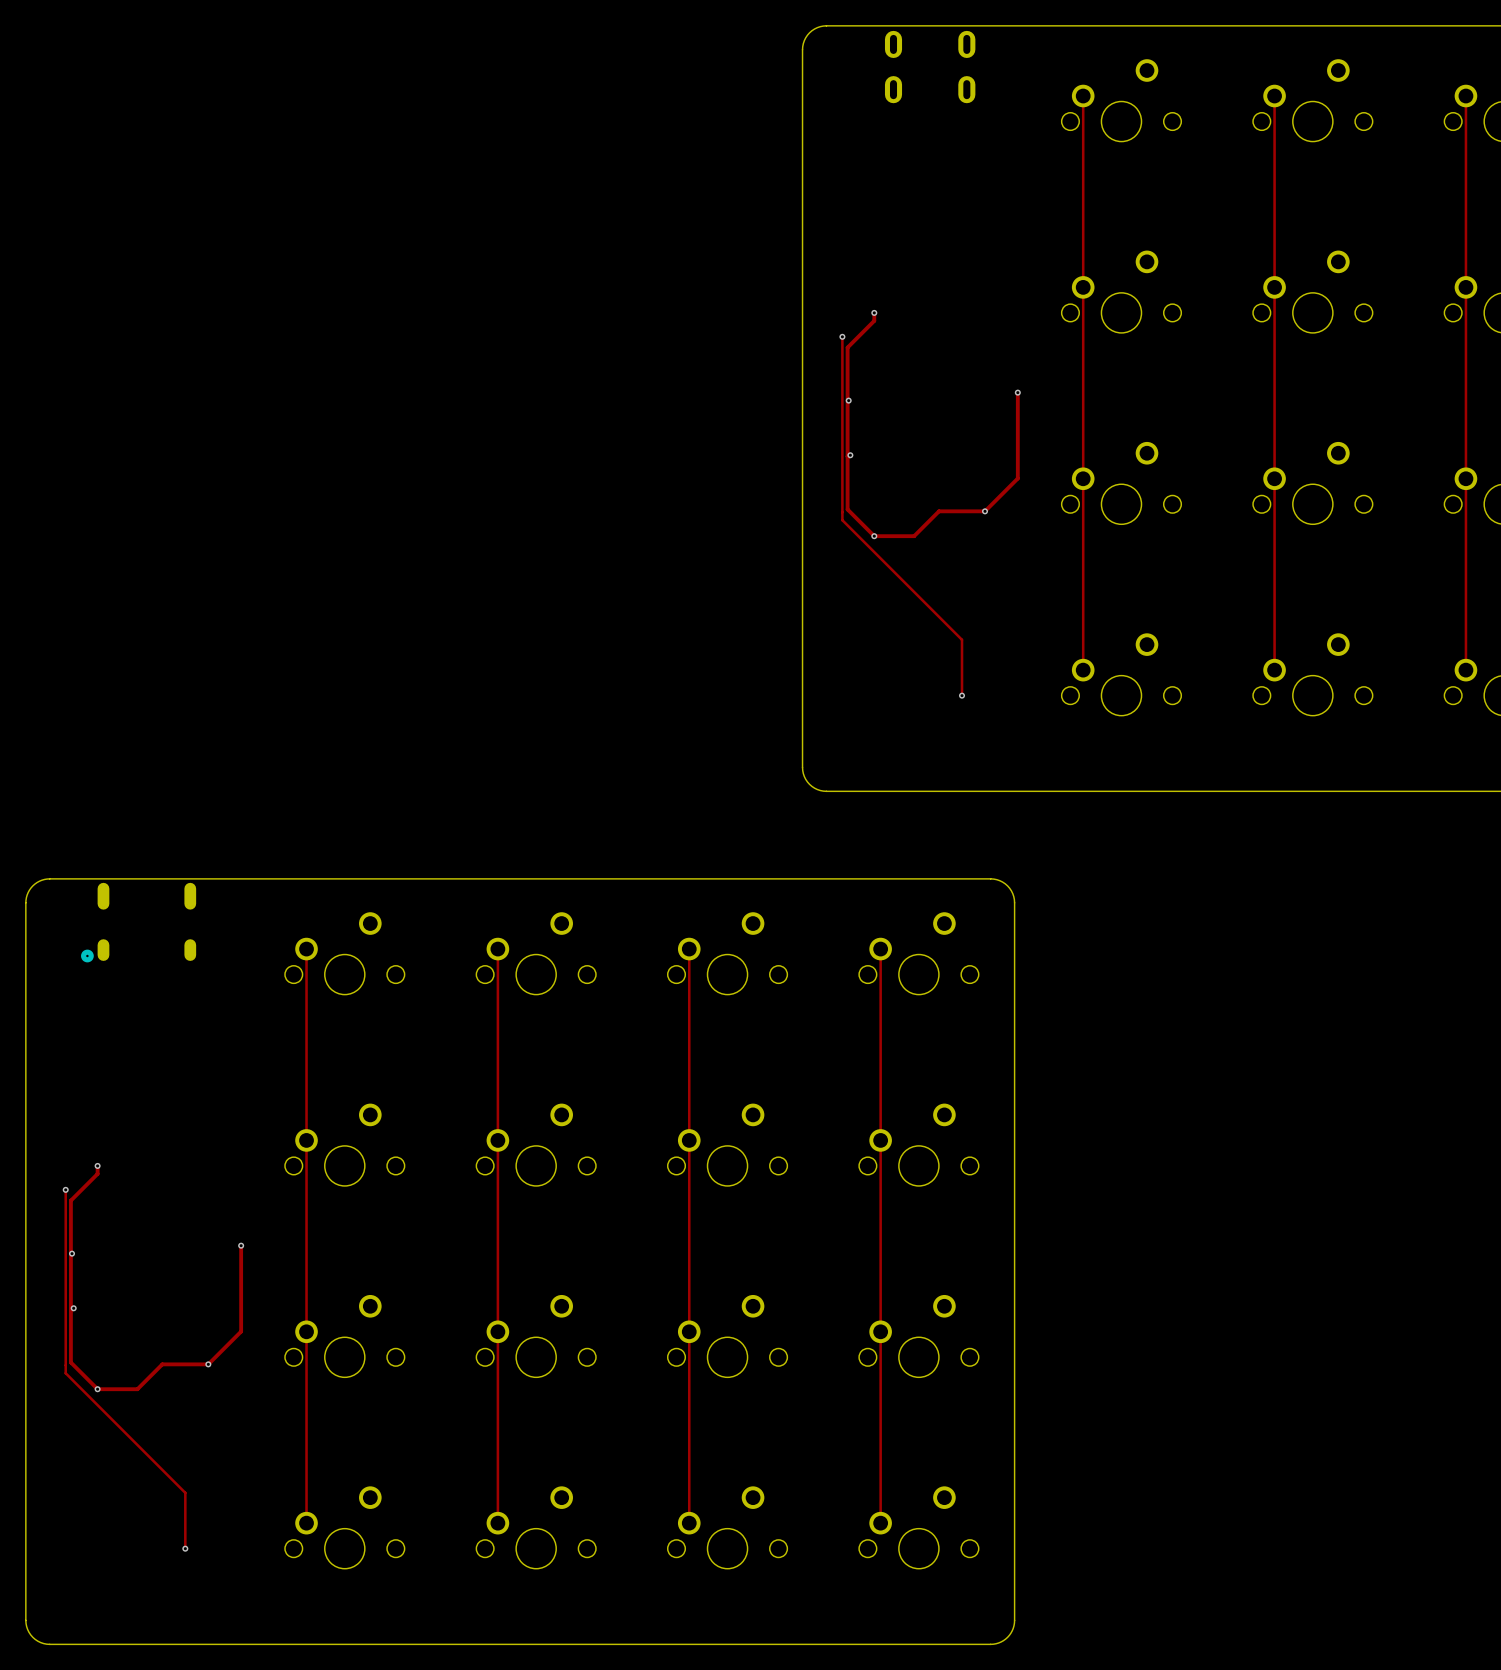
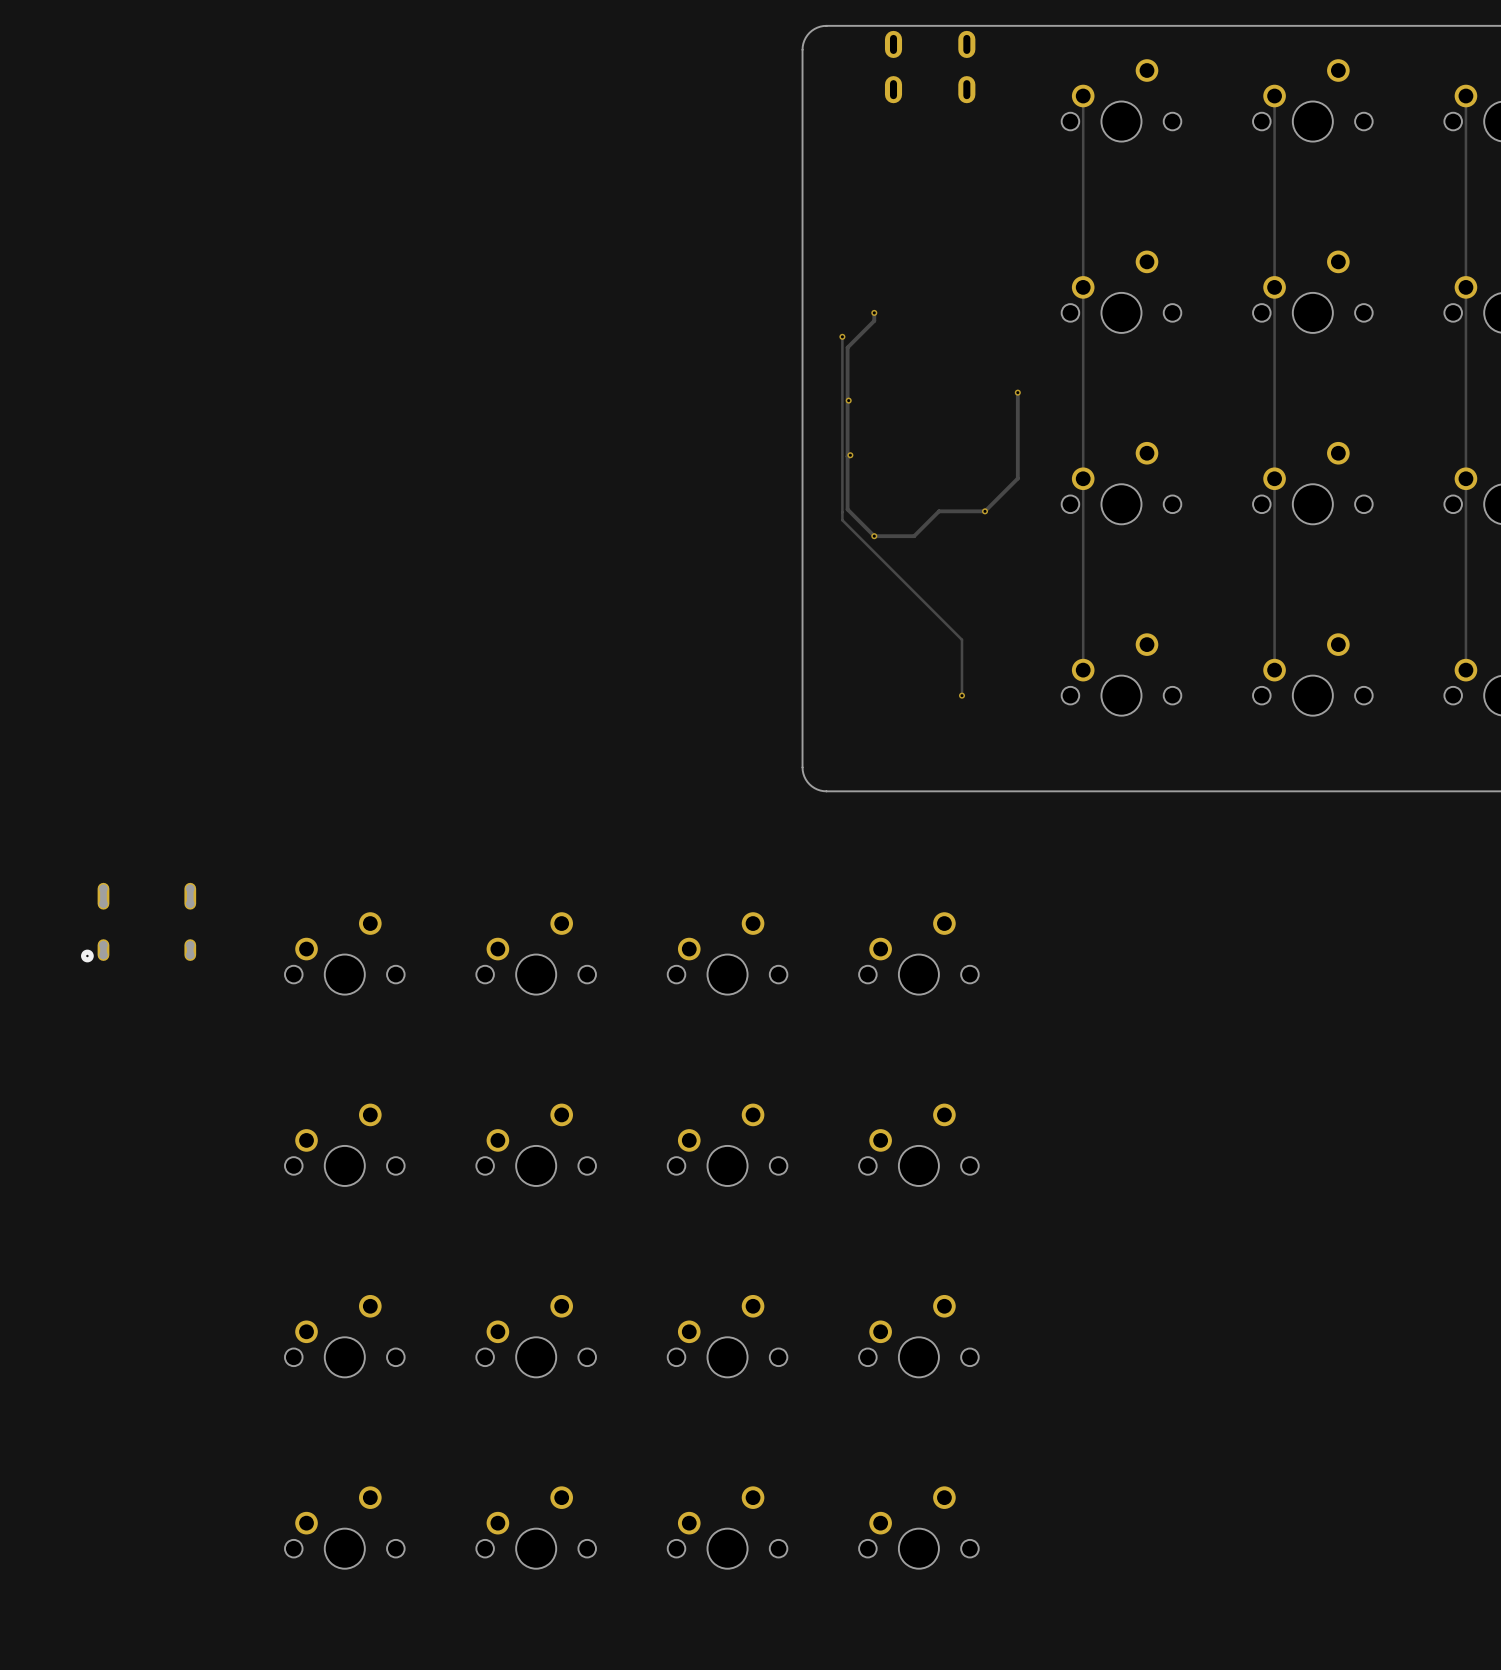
board edge: (49, 878) (990, 878) (1005, 883) (1011, 890) (1014, 902) (1014, 1620) (1009, 1635) (1001, 1641) (990, 1644) (49, 1644) (35, 1639) (29, 1632) (25, 1620) (25, 902) (28, 892) (32, 885) (39, 881) (49, 878) -> none
track: (306, 949) (306, 1523) -> none
track: (497, 949) (497, 1523) -> none
track: (689, 949) (689, 1523) -> none
track: (880, 949) (880, 1523) -> none
track: (97, 1165) (97, 1173) (70, 1200) (70, 1362) (97, 1389) (137, 1389) (162, 1364) (208, 1364) (241, 1331) (241, 1245) -> none
via: (97, 1165) -> none
track: (65, 1189) (65, 1373) (185, 1492) (185, 1548) -> none
via: (65, 1189) -> none
via: (241, 1245) -> none
via: (72, 1253) -> none
via: (73, 1308) -> none
via: (208, 1364) -> none
via: (97, 1389) -> none
via: (185, 1548) -> none

